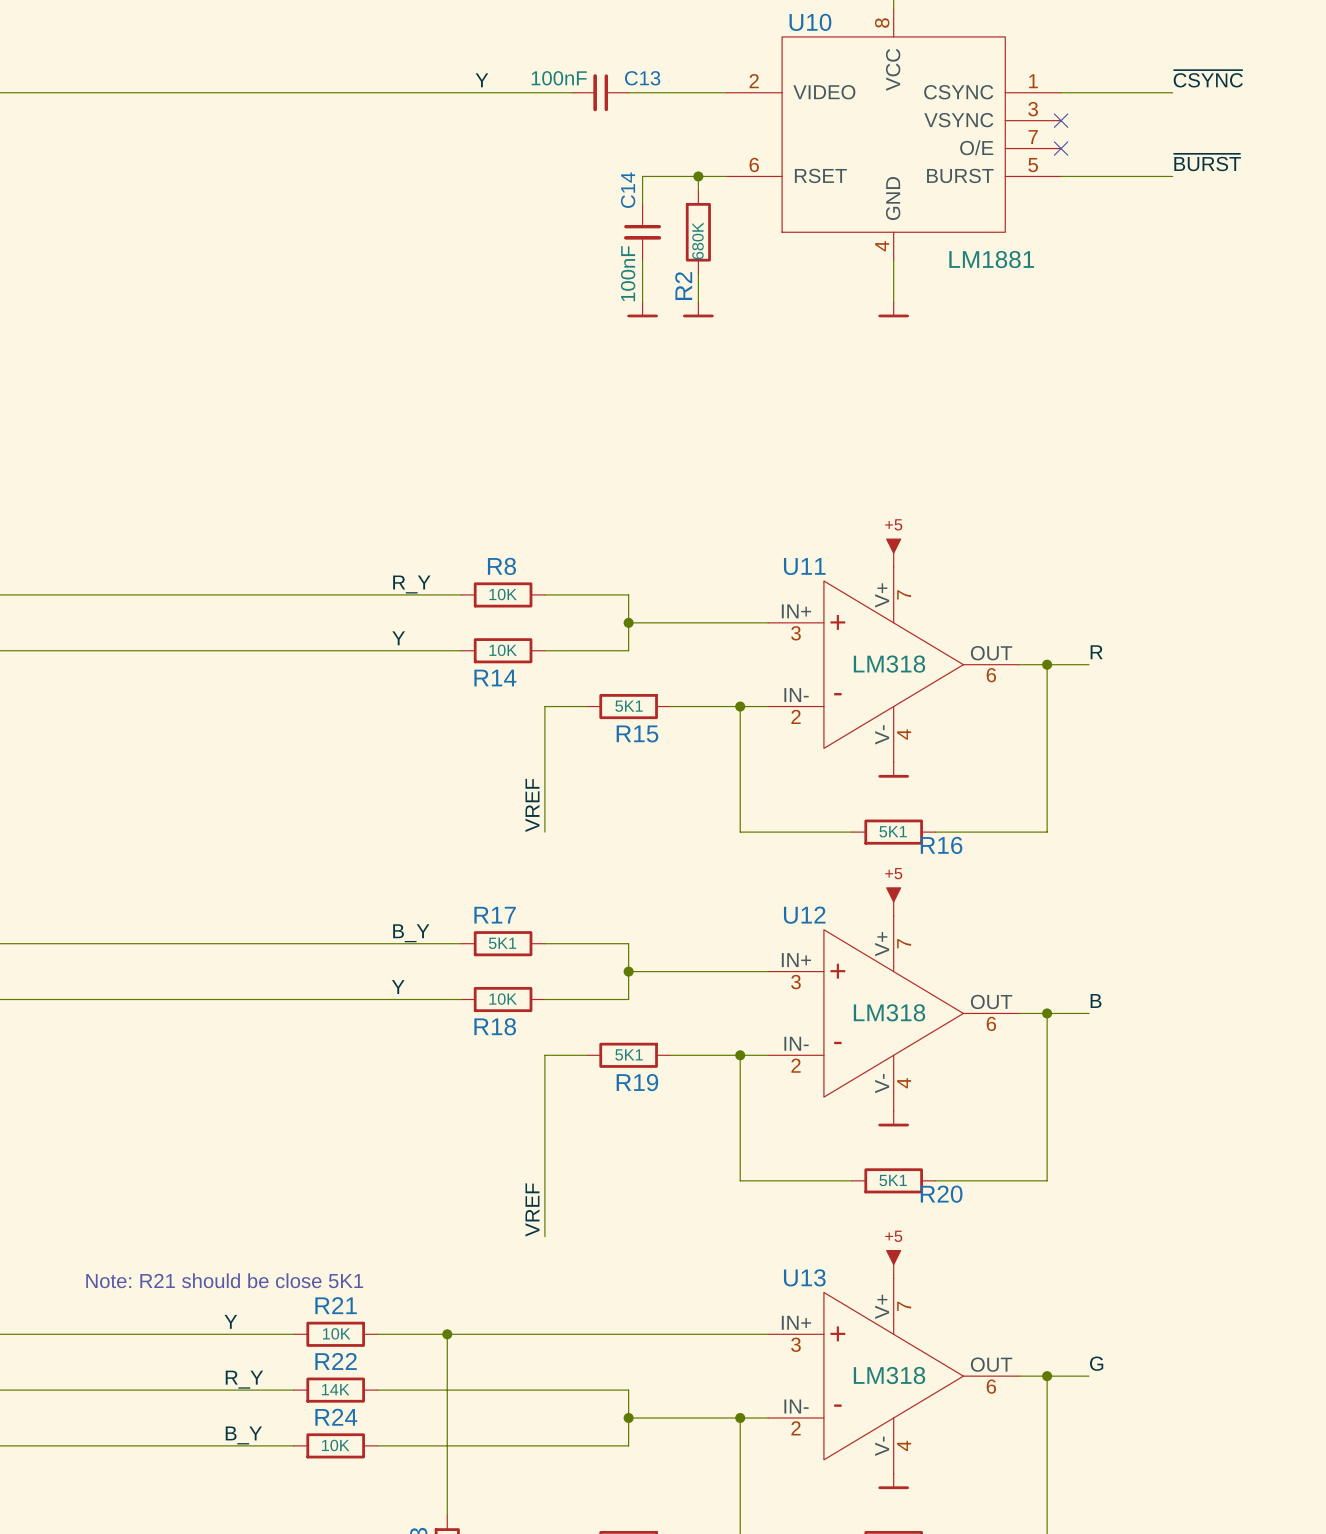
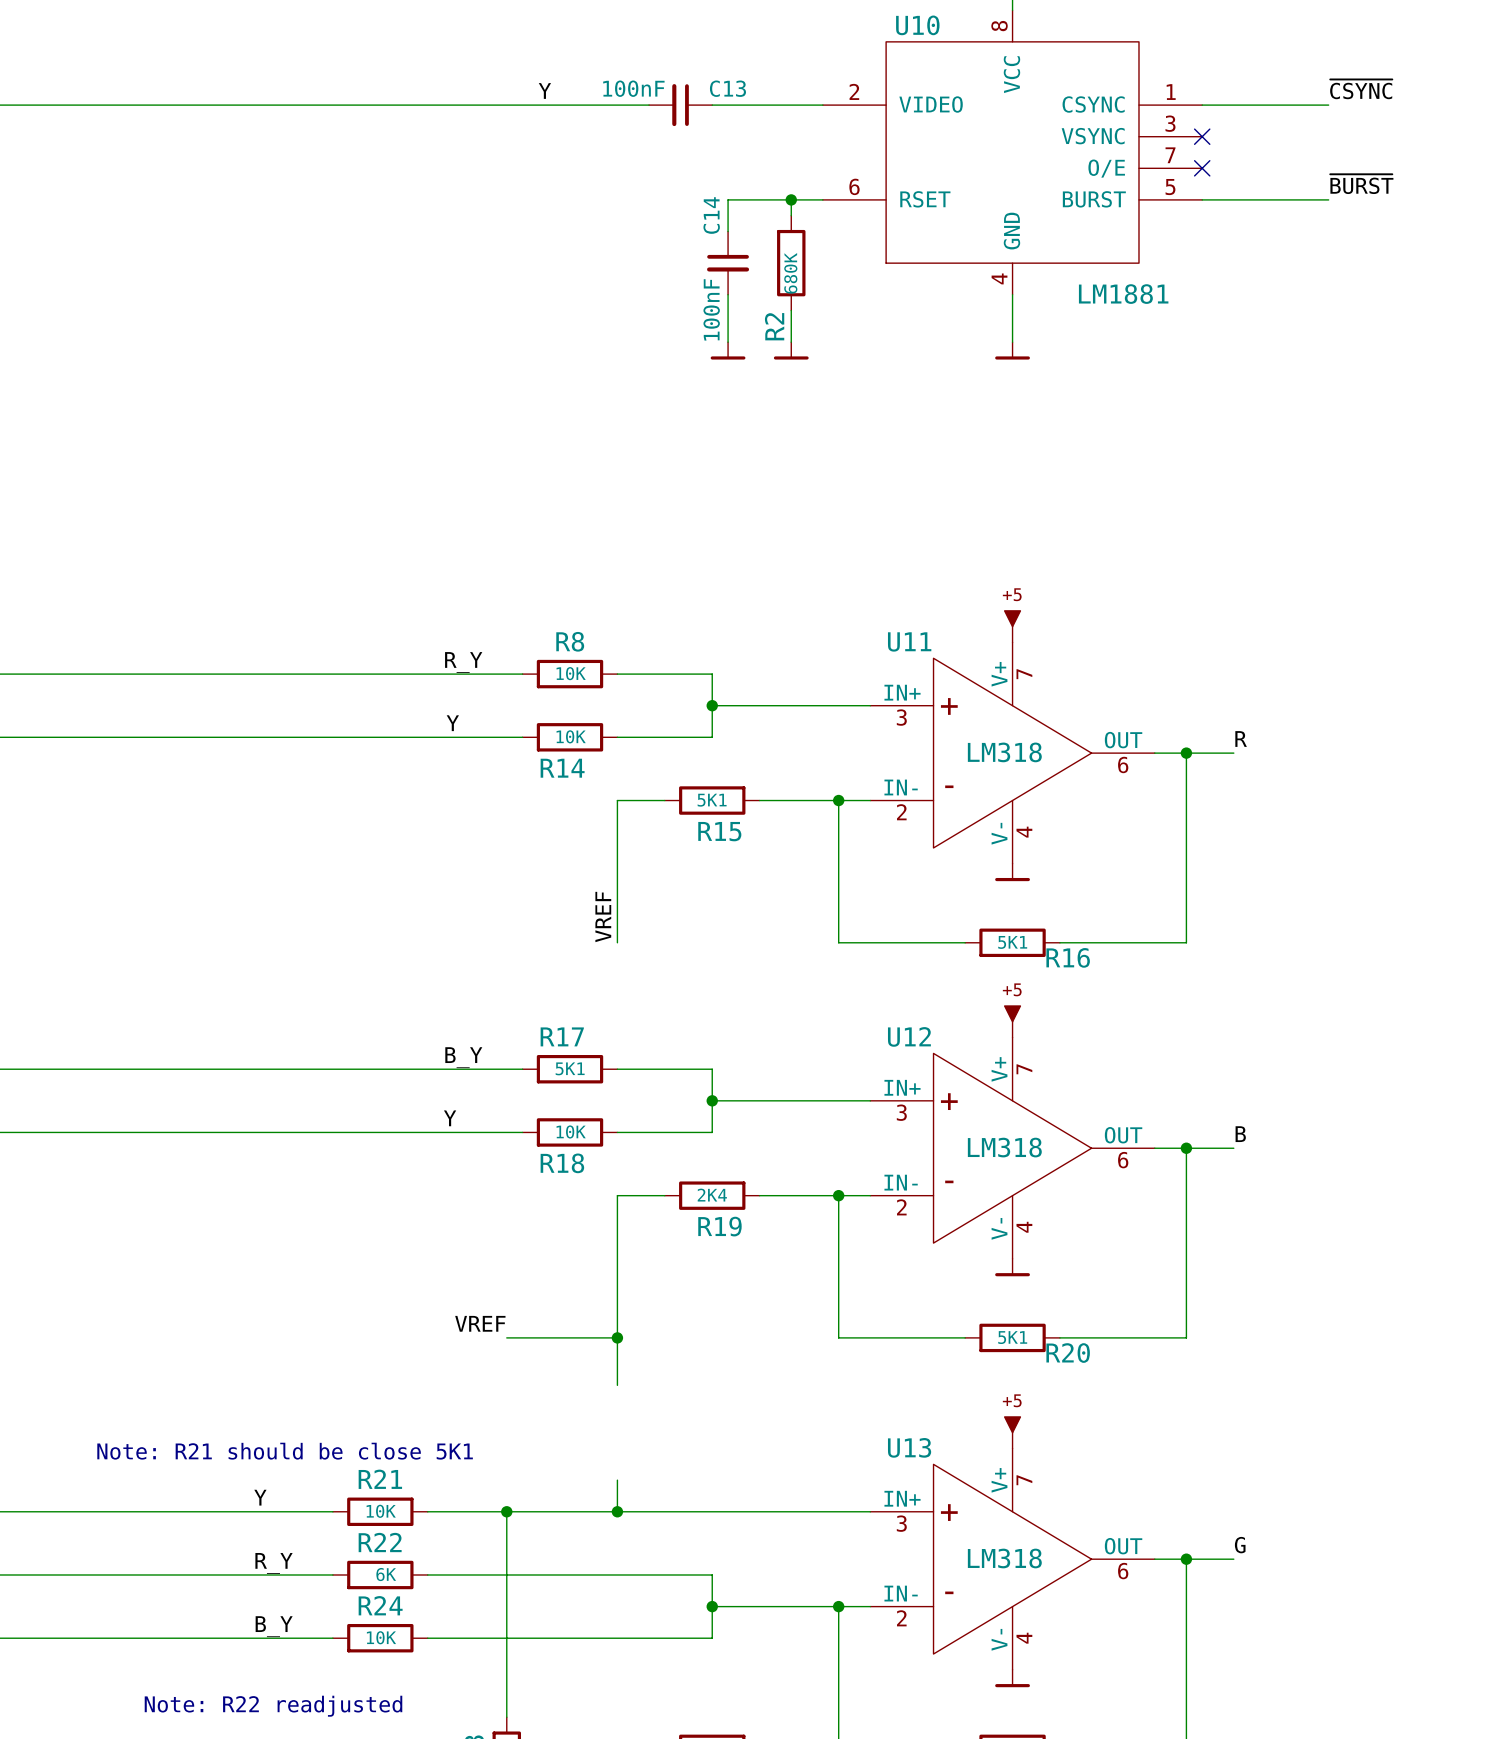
R19 value: 5K1 (629, 1054) -> 2K4 (712, 1195)
wire: none -> (506, 1337) (617, 1337)
junction: none -> (617, 1337)
label rotation: 0° (532, 1209) -> 90° clockwise (480, 1323)
label position: VREF (532, 1209) -> VREF (480, 1323)
wire: (544, 1222) (544, 1236) -> none
wire: none -> (617, 1480) (617, 1511)
junction: none -> (617, 1511)
R22 value: 14K (335, 1389) -> 6K (386, 1574)
text: none -> Note: R22 readjusted (273, 1706)

